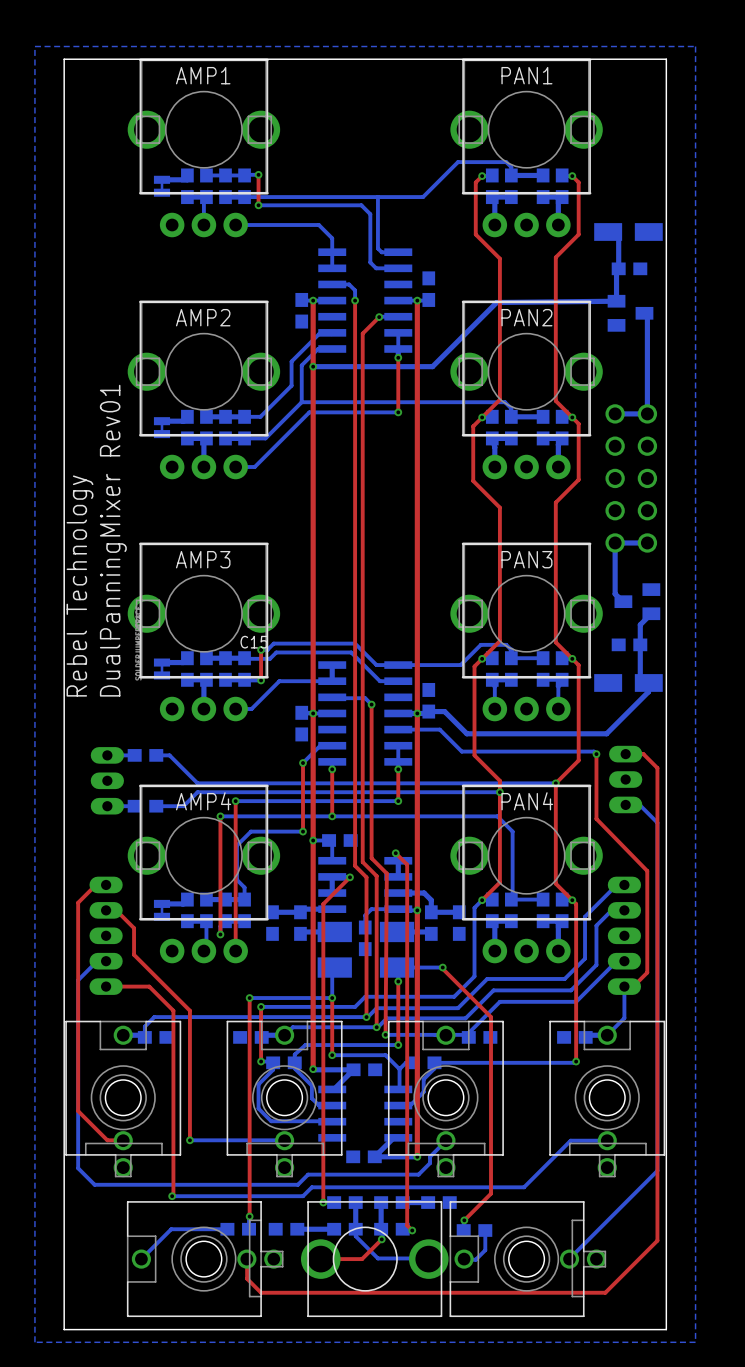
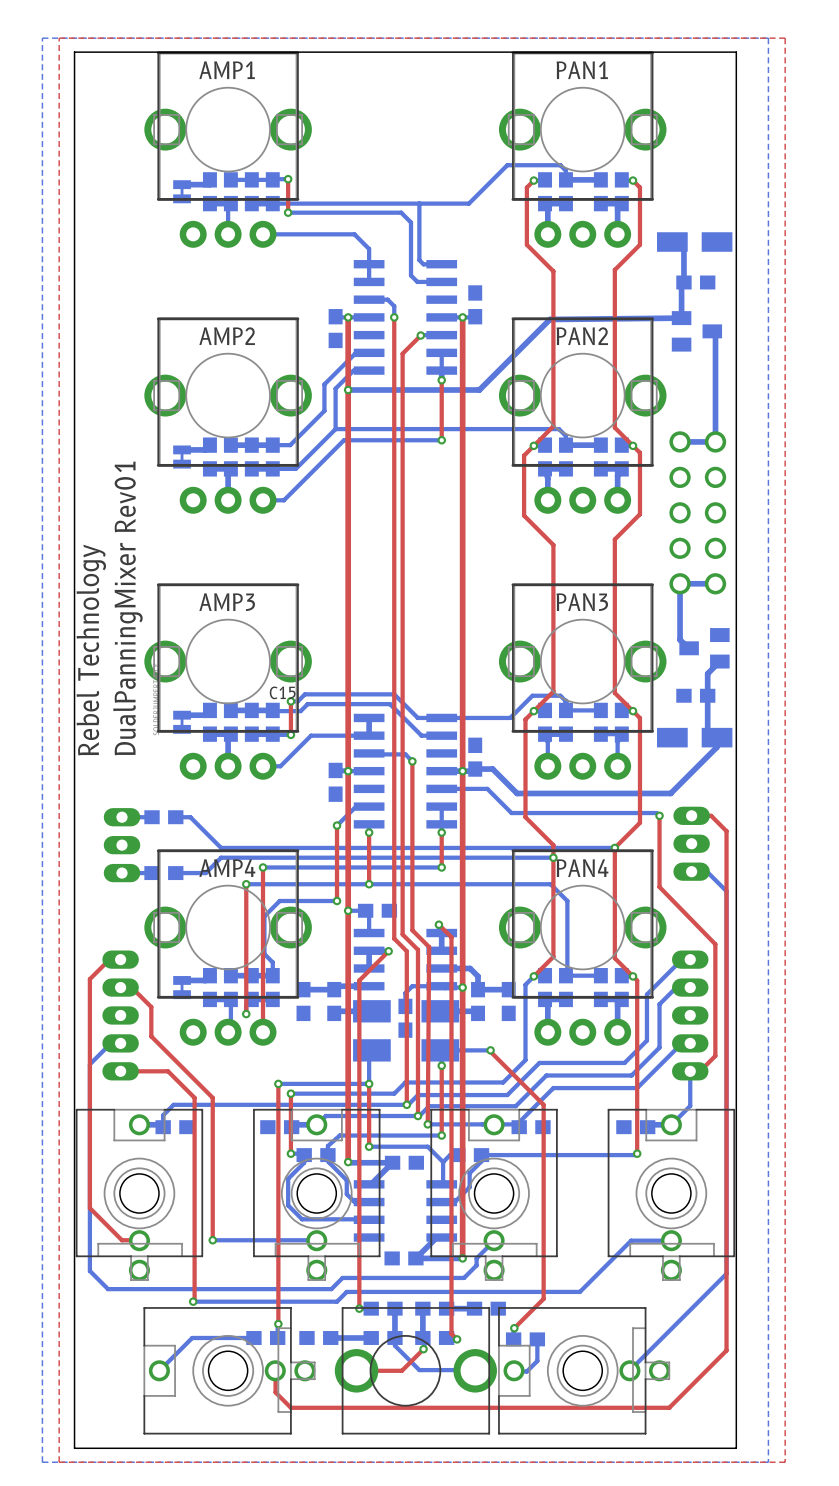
top zone outline: none -> (59, 38) (59, 1462) (785, 1462) (785, 38) (59, 38)

